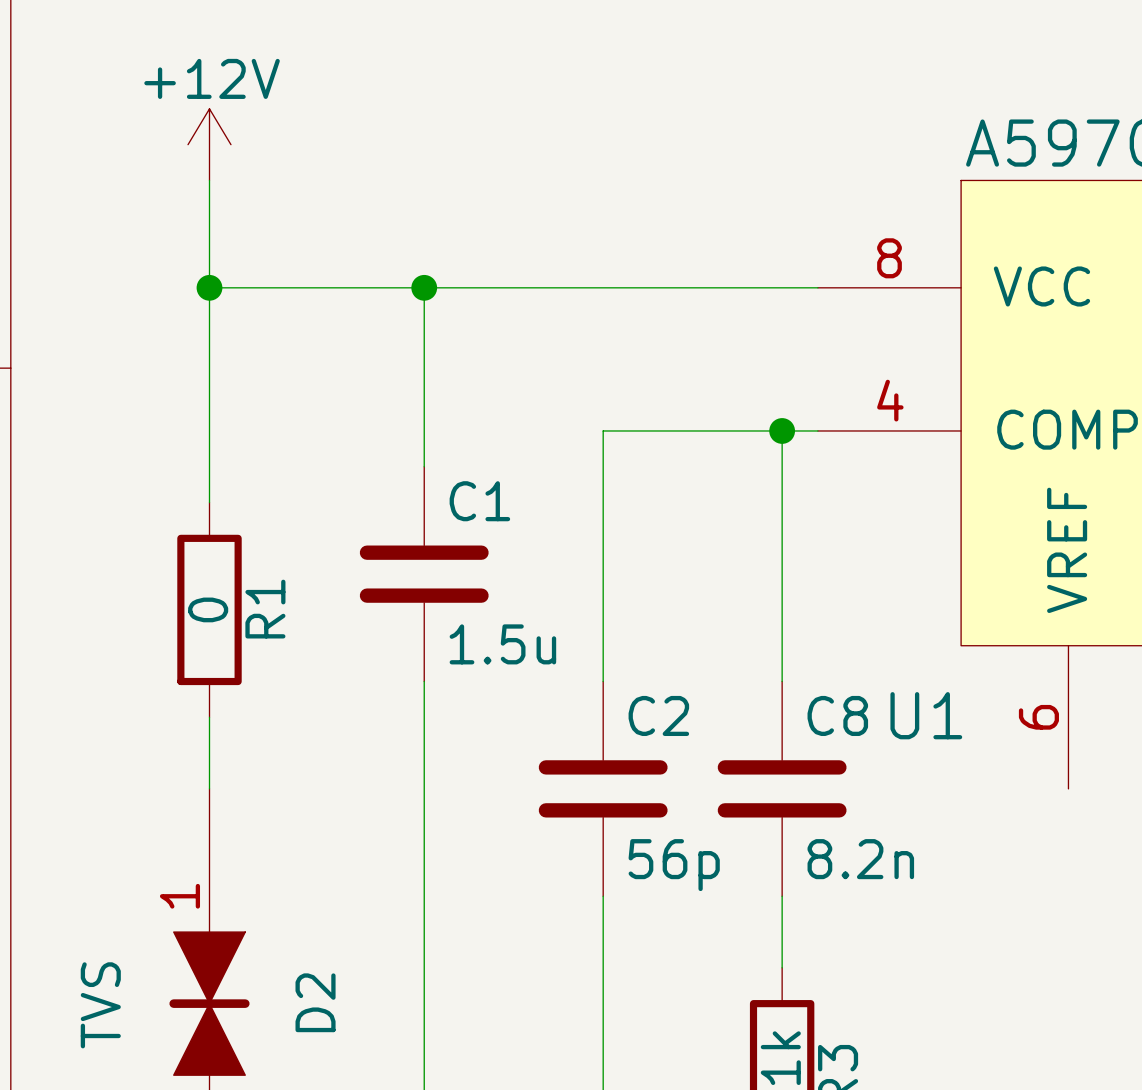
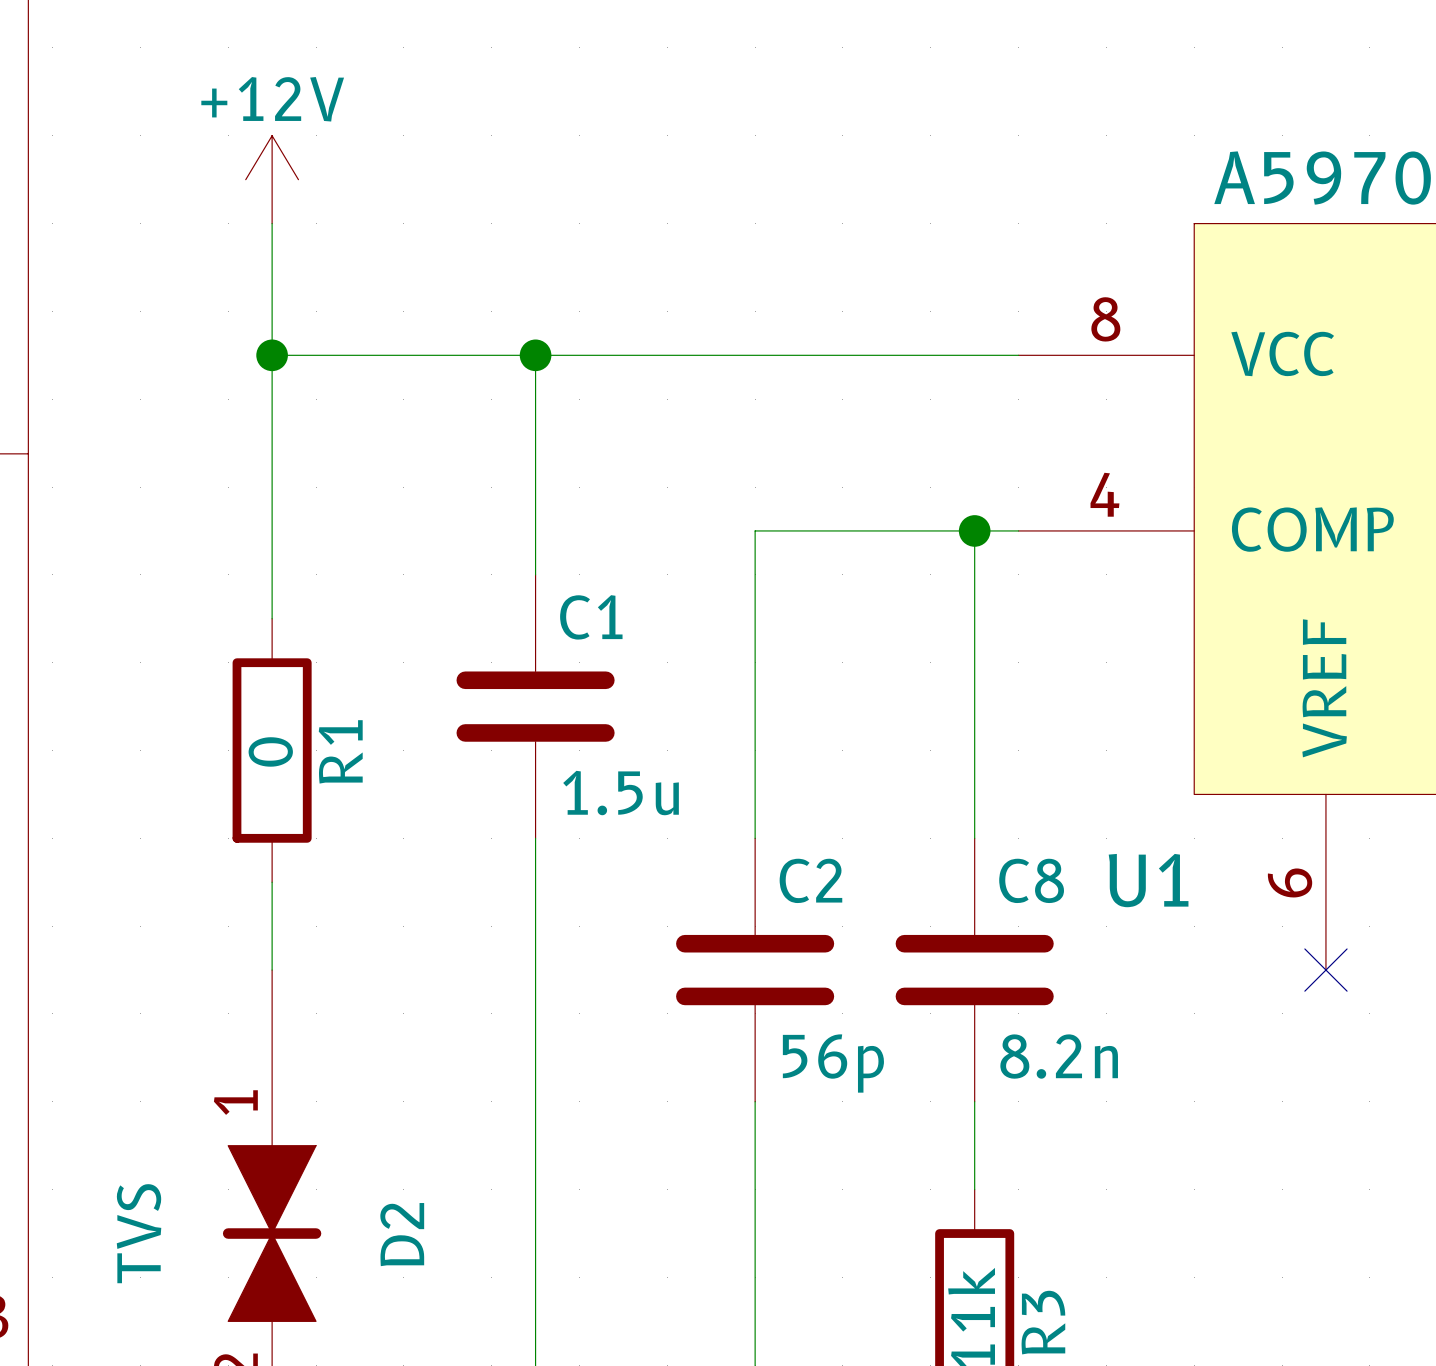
no-connect mark: none -> (1325, 970)

